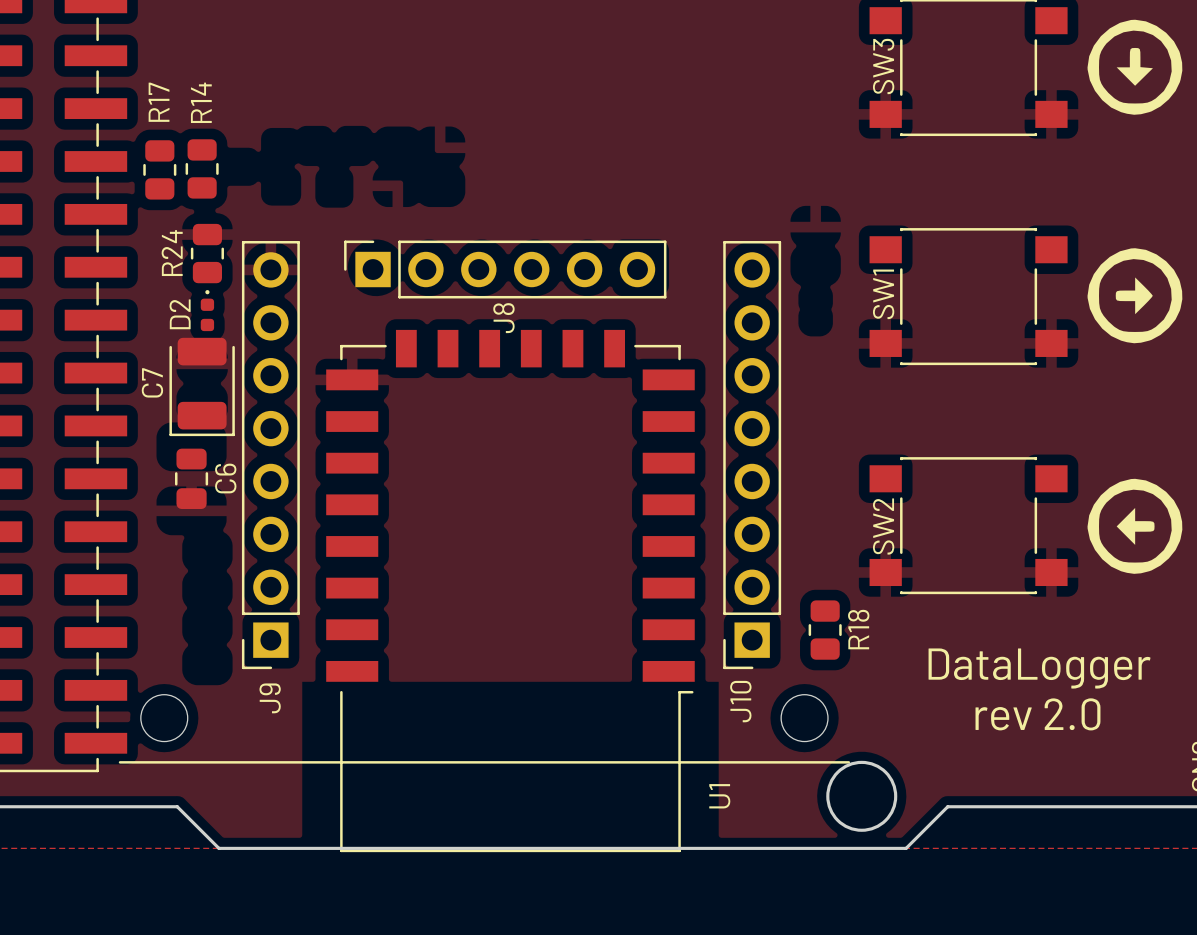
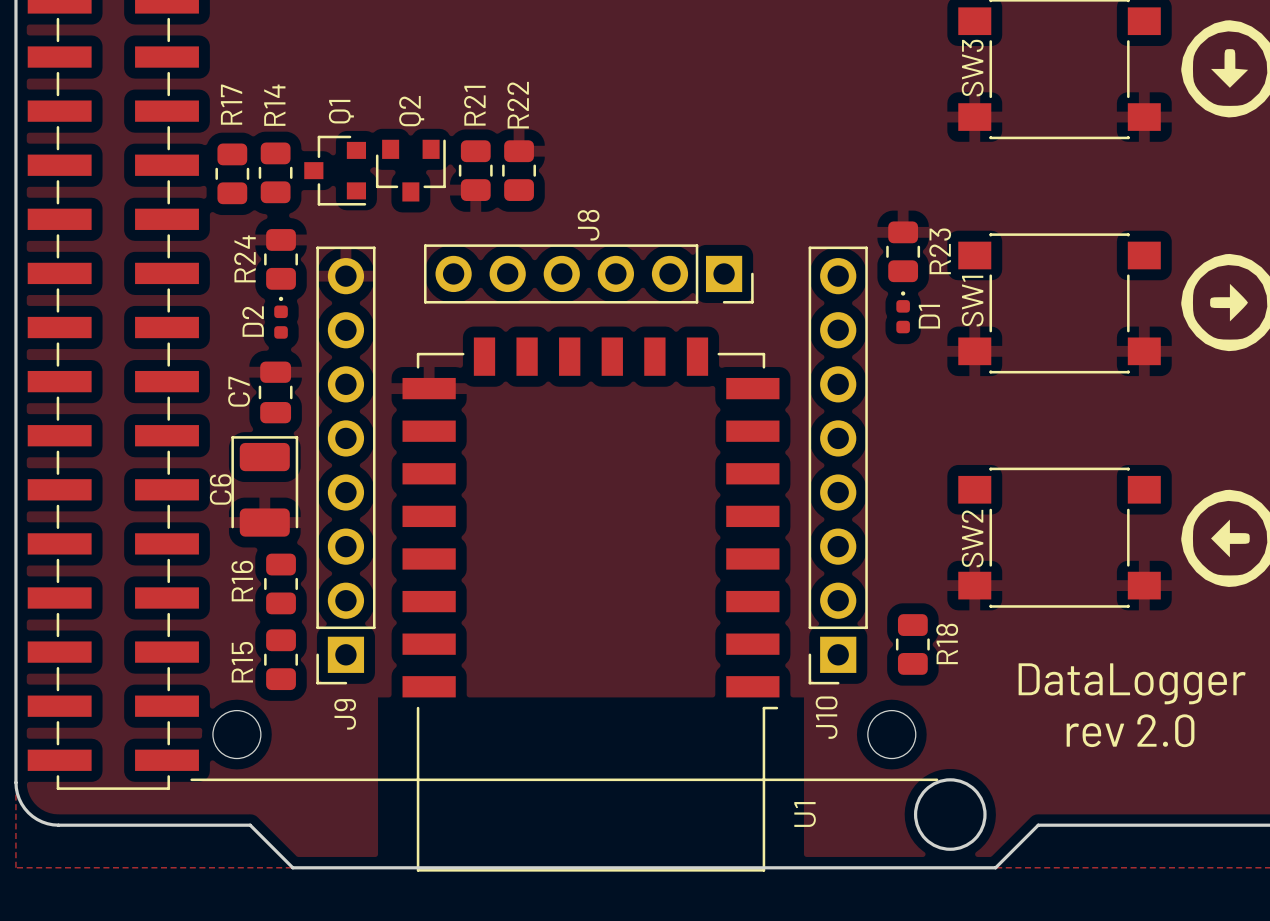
Q1: none -> (335, 170)
Q2: none -> (410, 170)
R21: none -> (475, 170)
R22: none -> (519, 170)
R23: none -> (903, 251)
J8 rotation: 0° (505, 269) -> 180° (588, 273)
D1: none -> (903, 312)
C7 footprint: [169, 337, 235, 437] -> [258, 361, 293, 424]
C6 footprint: [175, 448, 209, 510] -> [231, 436, 299, 537]
C6 name position: C6 (225, 478) -> C6 (220, 489)
R16: none -> (281, 583)
R15: none -> (281, 659)

